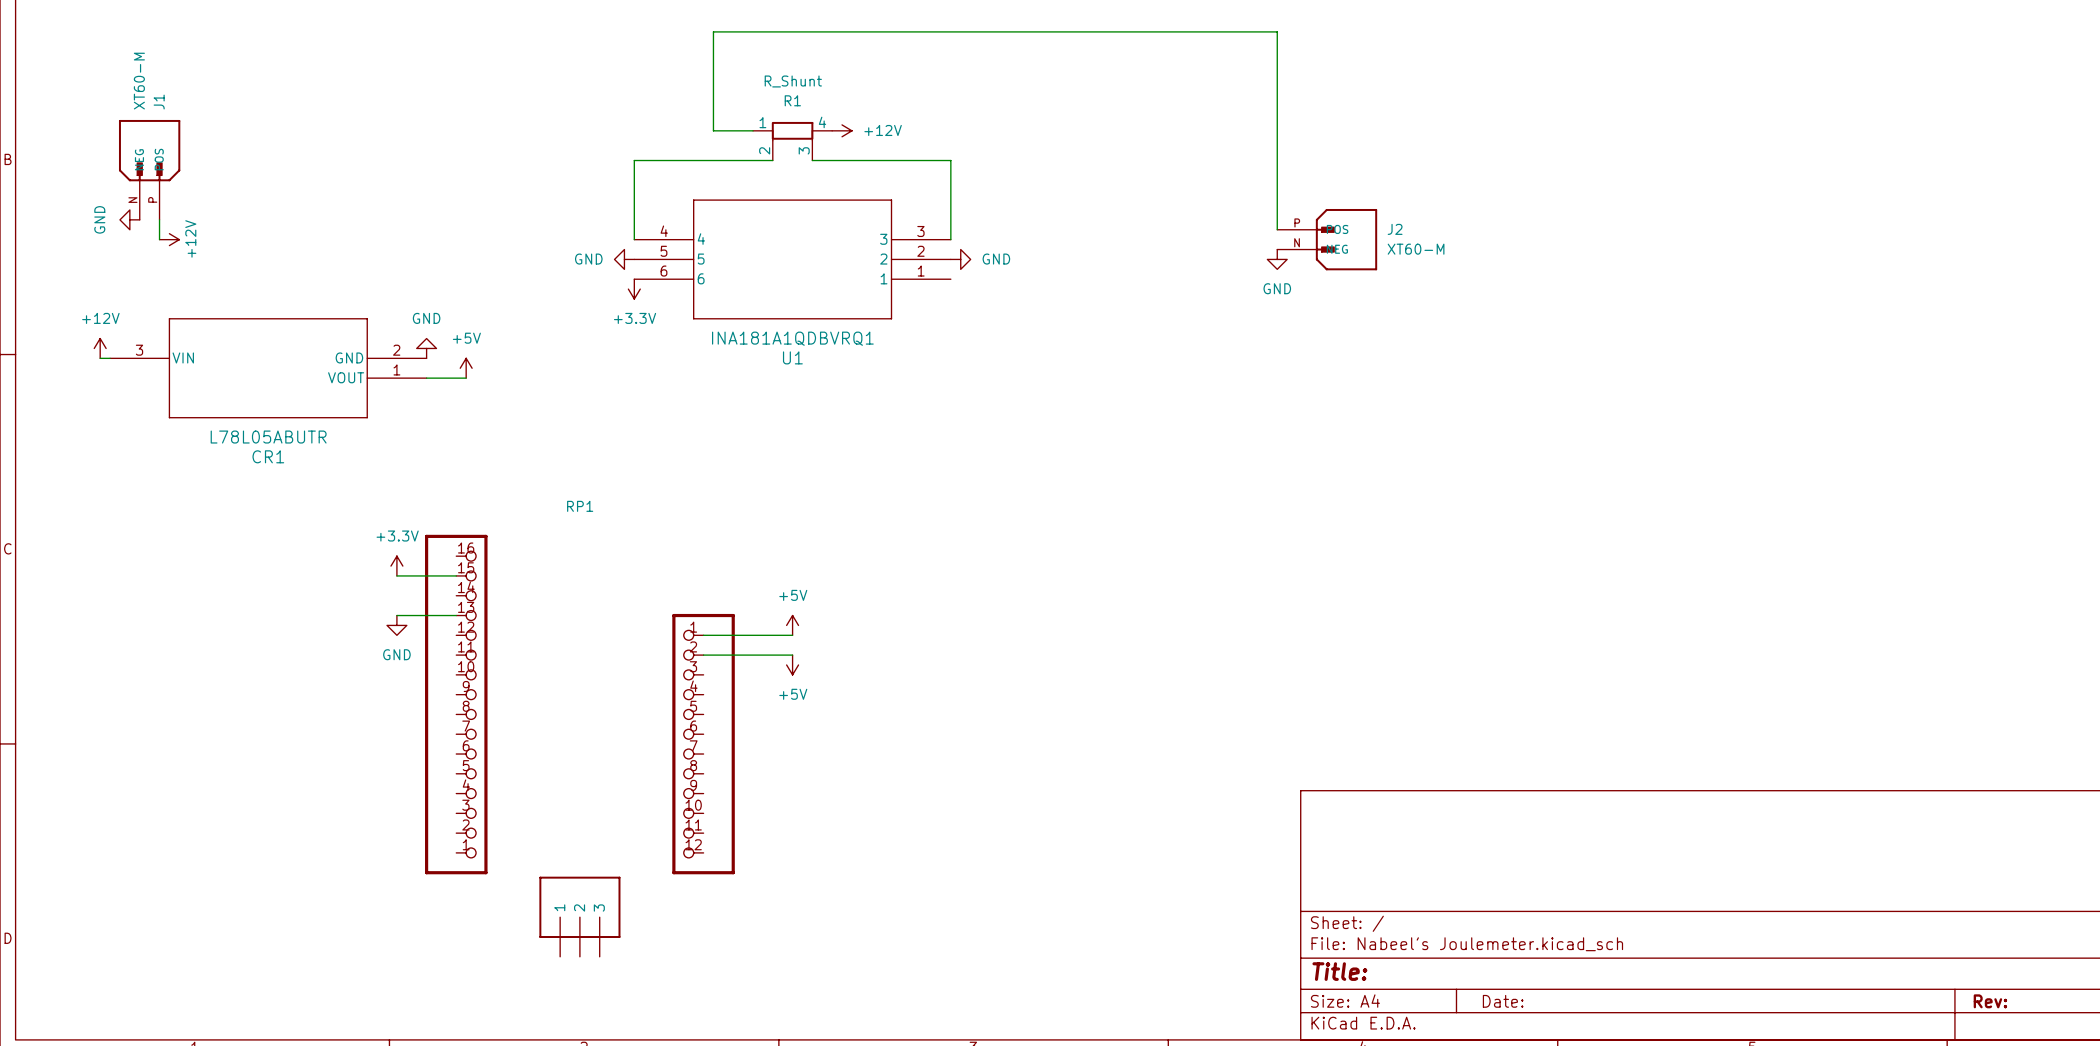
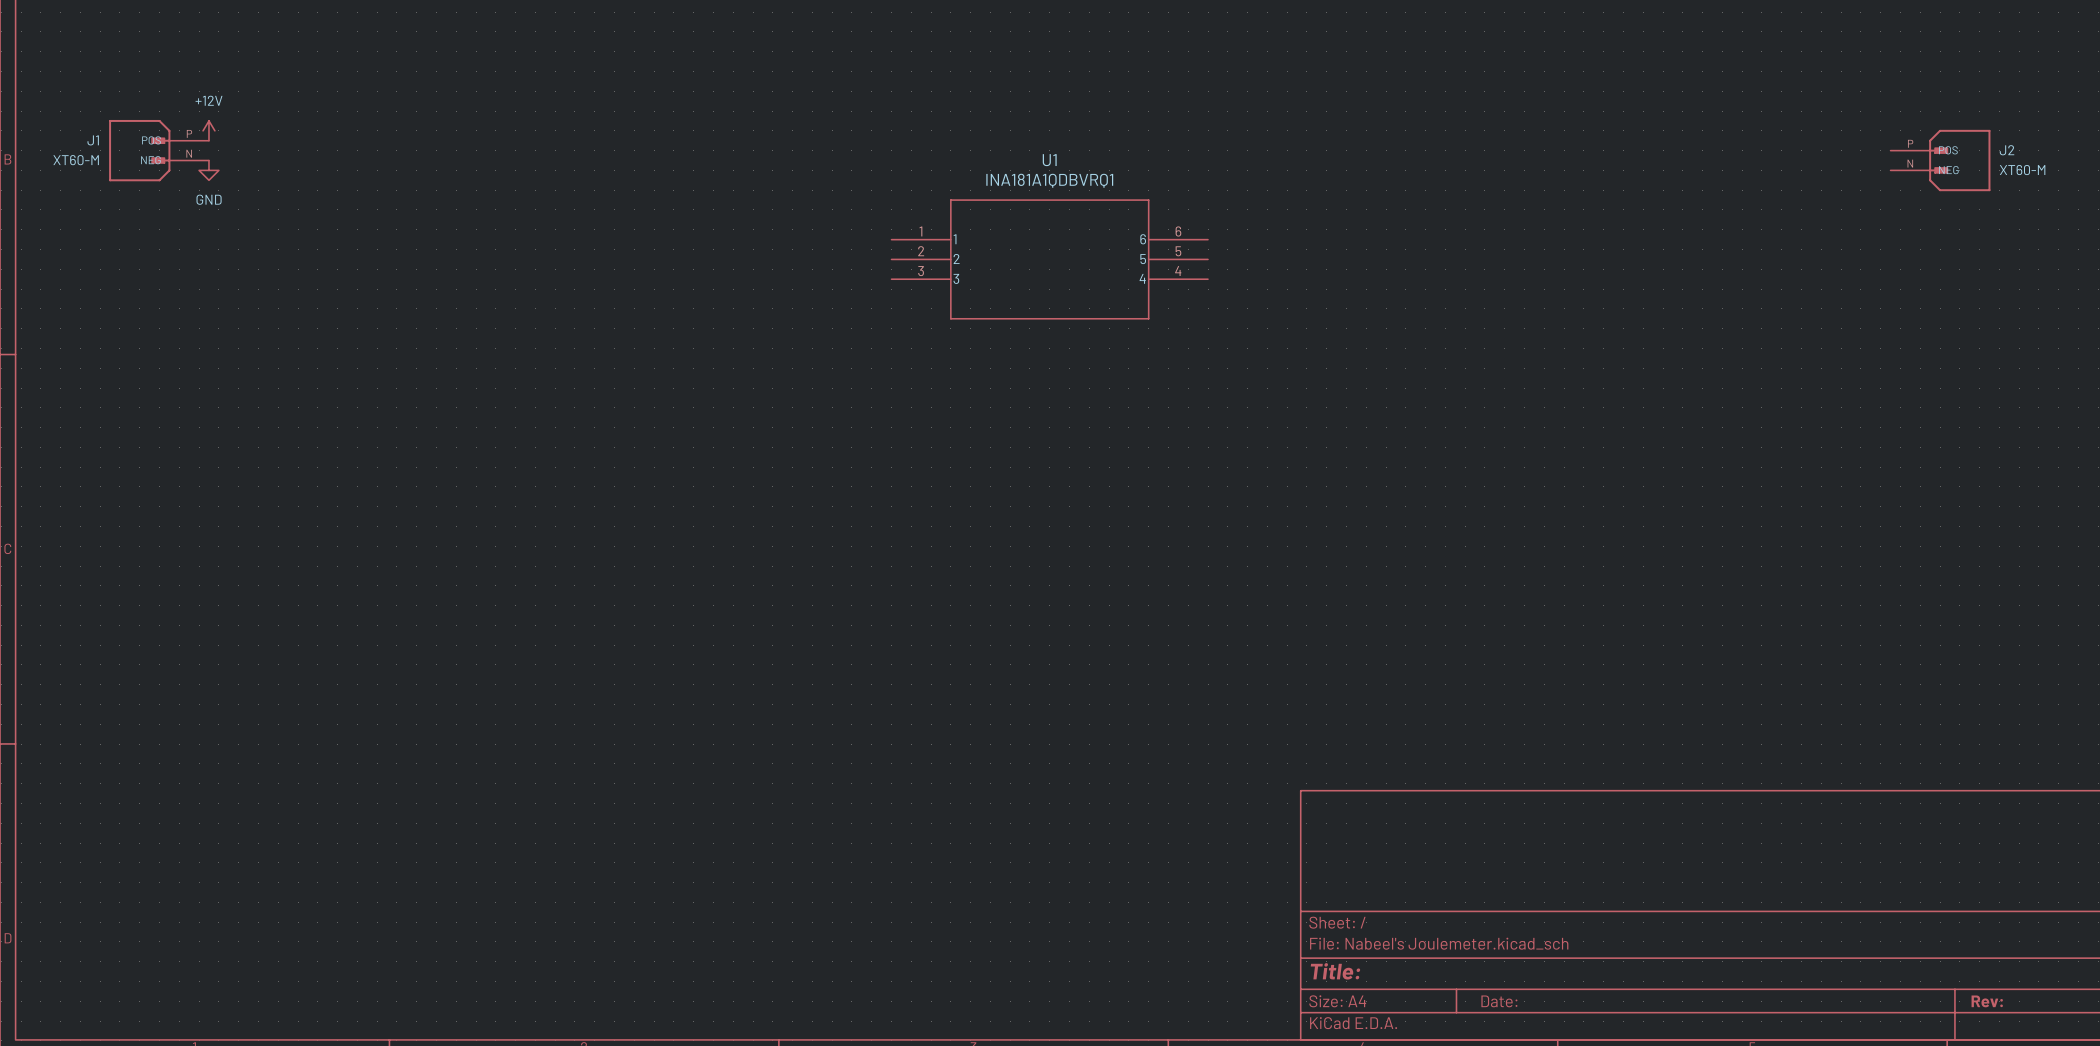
wire: (753, 130) (713, 130) (713, 31) (1277, 31) (1277, 229) -> none
power symbol: +12V (842, 130) -> none
R1: R_Shunt (792, 141) -> none
J1 rotation: 0° (149, 150) -> 90° counterclockwise (139, 150)
wire: (772, 160) (634, 160) (634, 239) -> none
wire: (812, 160) (950, 160) (950, 239) -> none
power symbol rotation: 0° (129, 219) -> 90° counterclockwise (208, 170)
power symbol position: GND (129, 219) -> GND (208, 170)
wire: (159, 219) (159, 239) -> none
power symbol rotation: 0° (169, 239) -> 90° counterclockwise (208, 130)
power symbol position: +12V (169, 239) -> +12V (208, 130)
J2 position: (1327, 239) -> (1940, 160)
power symbol: GND (624, 259) -> none
U1 rotation: 0° (792, 259) -> 180° (1049, 259)
U1 position: (792, 259) -> (1049, 259)
power symbol: GND (960, 259) -> none
power symbol: GND (1277, 259) -> none
power symbol: +3.3V (634, 289) -> none
power symbol: +12V (100, 348) -> none
power symbol: GND (426, 348) -> none
wire: (100, 358) (110, 358) -> none
CR1: L78L05ABUTR (268, 368) -> none
power symbol: +5V (466, 368) -> none
wire: (426, 378) (466, 378) -> none
power symbol: +3.3V (396, 566) -> none
wire: (396, 575) (456, 575) -> none
wire: (396, 615) (456, 615) -> none
power symbol: GND (396, 625) -> none
power symbol: +5V (792, 625) -> none
wire: (703, 635) (792, 635) -> none
wire: (703, 655) (792, 655) -> none
power symbol: +5V (792, 664) -> none
RP1: (579, 745) -> none

